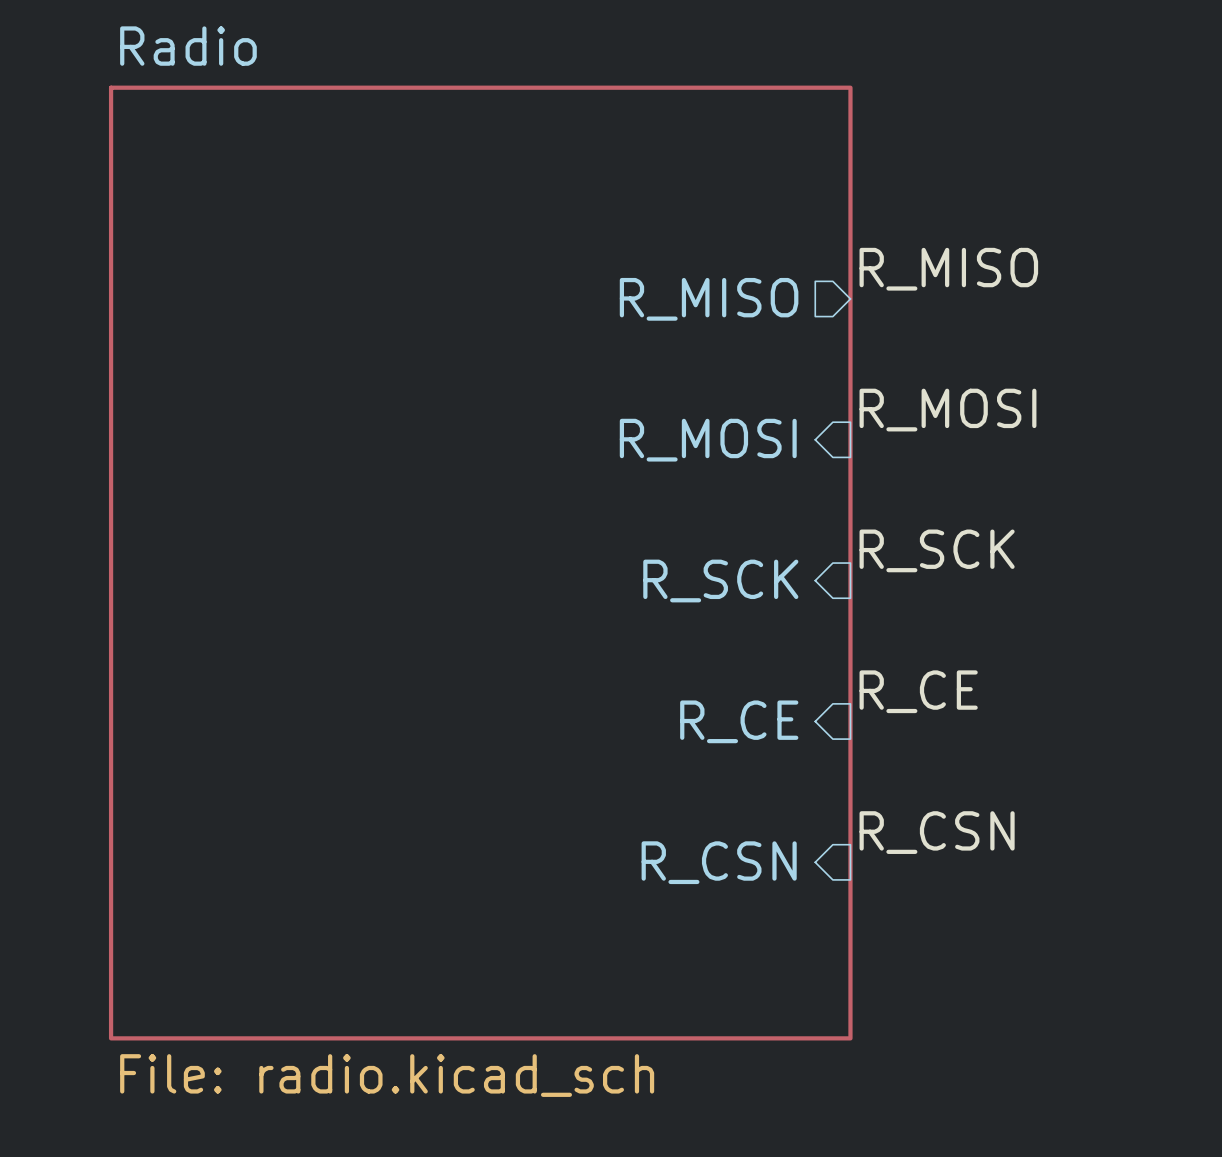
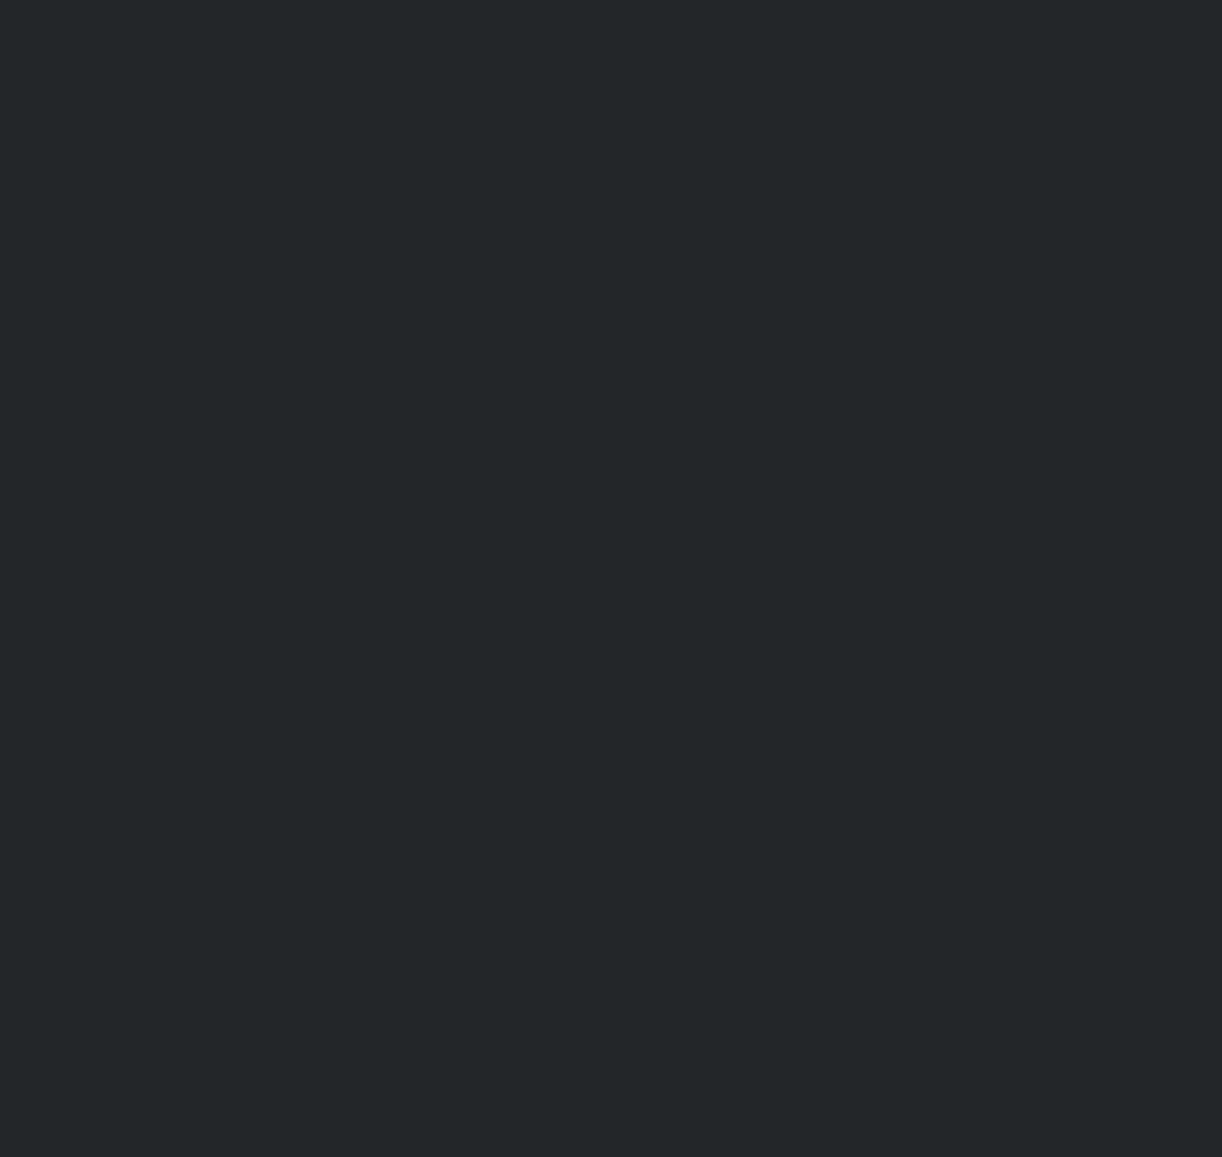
label: R_MISO (948, 269) -> none
sheet pin: R_MISO (709, 299) -> none
label: R_MOSI (947, 410) -> none
sheet pin: R_MOSI (708, 440) -> none
label: R_SCK (937, 550) -> none
sheet Radio: File: radio.kicad_sch (480, 563) -> none
sheet pin: R_SCK (720, 581) -> none
label: R_CE (918, 691) -> none
sheet pin: R_CE (739, 721) -> none
label: R_CSN (937, 832) -> none
sheet pin: R_CSN (719, 862) -> none

